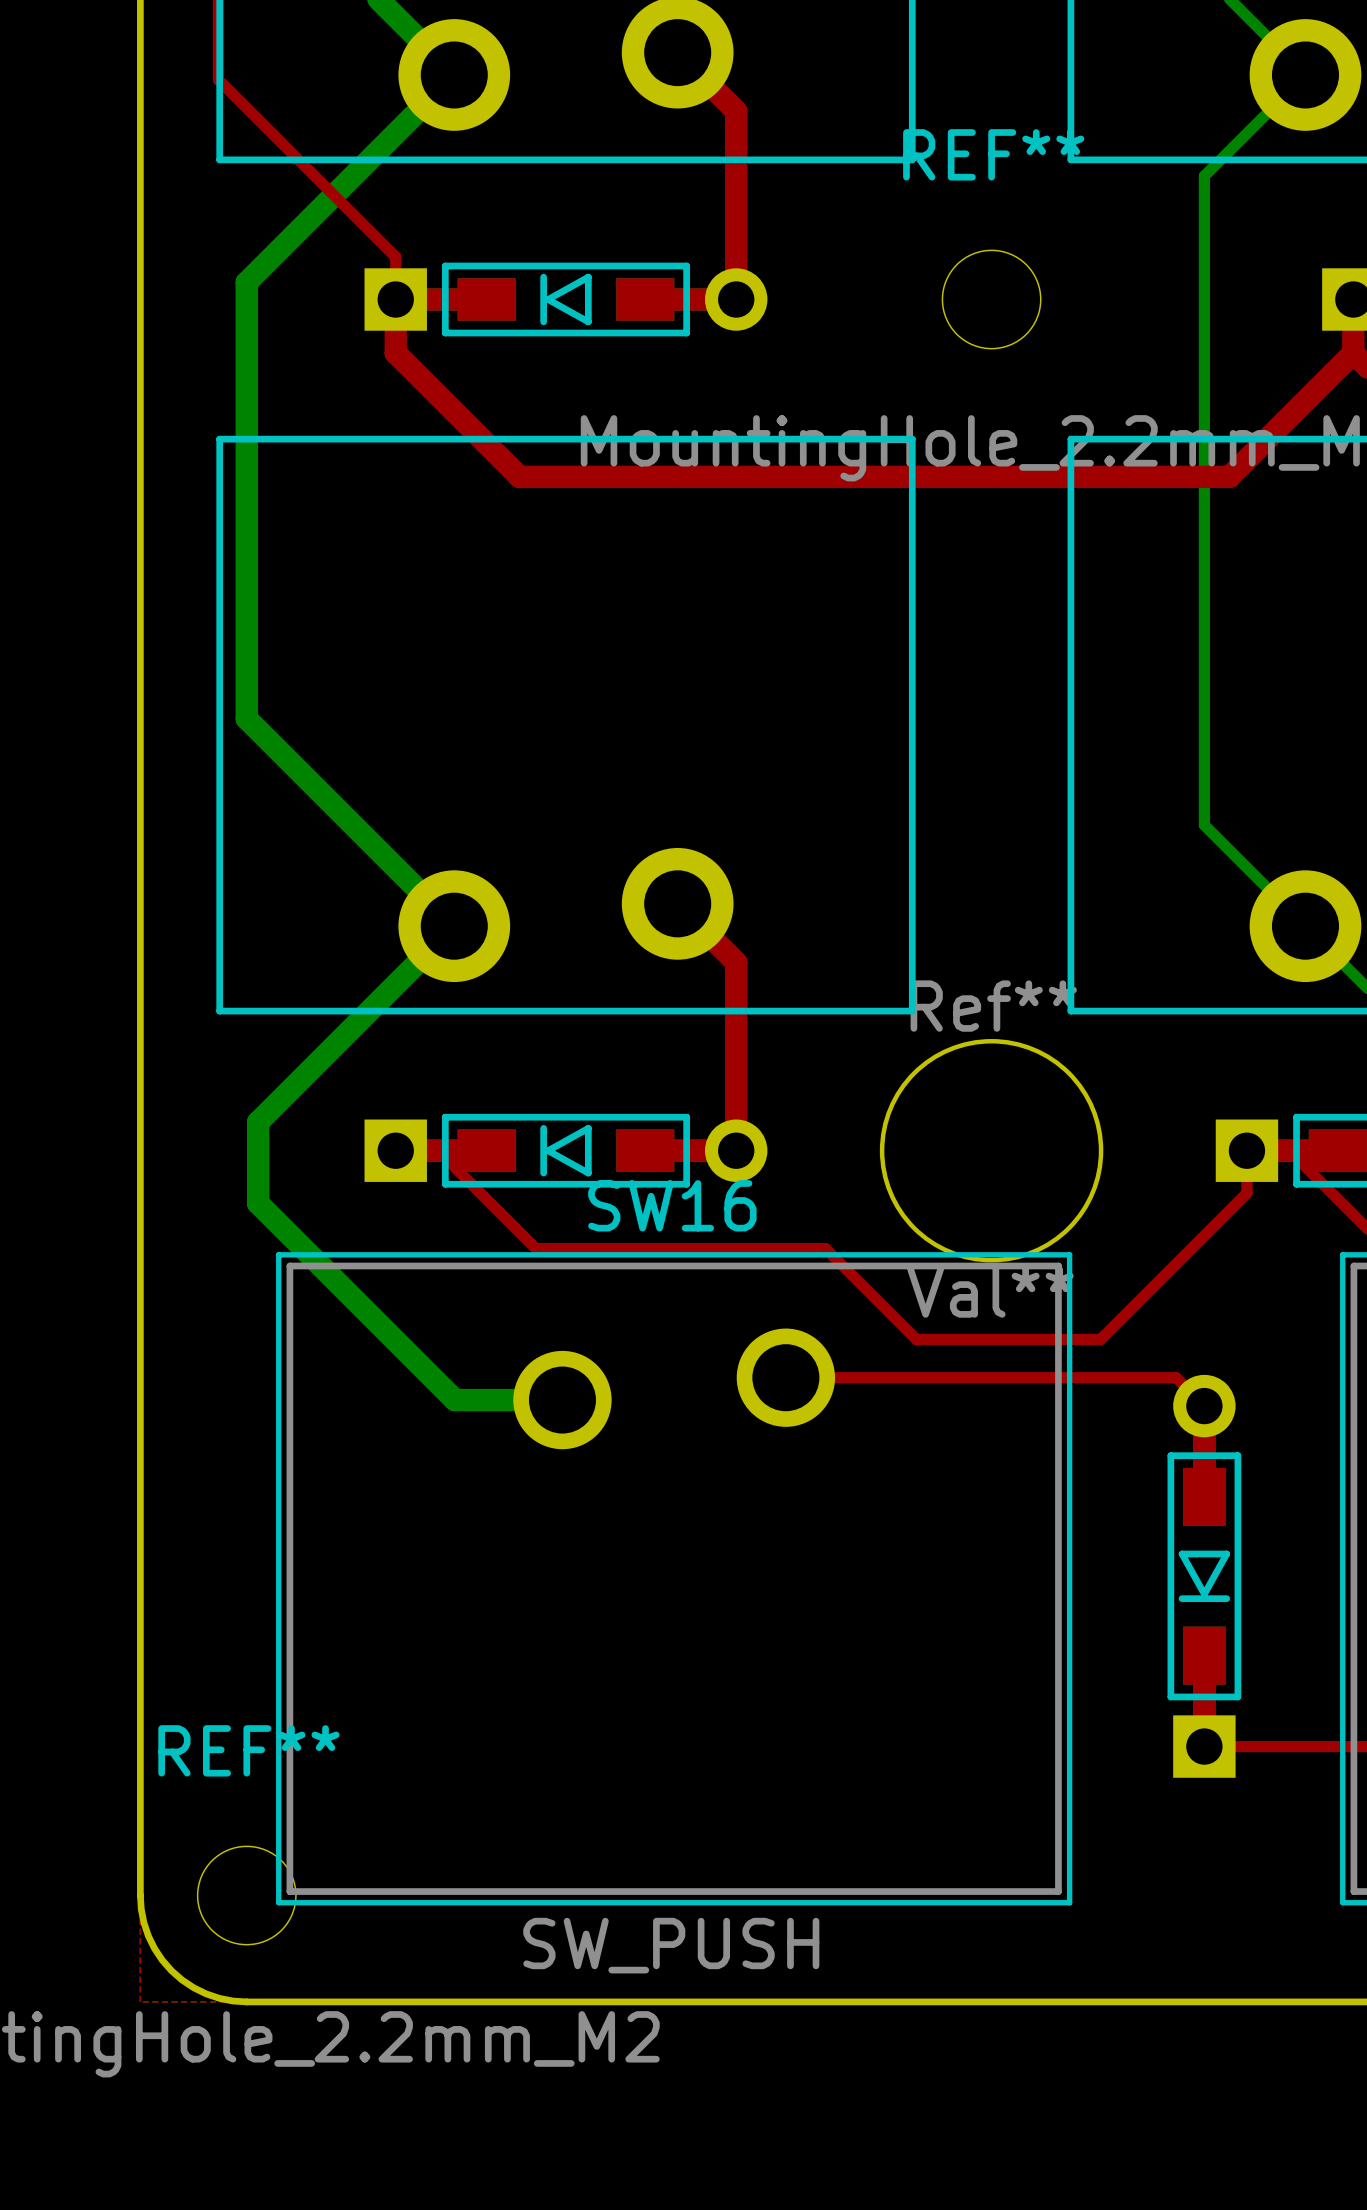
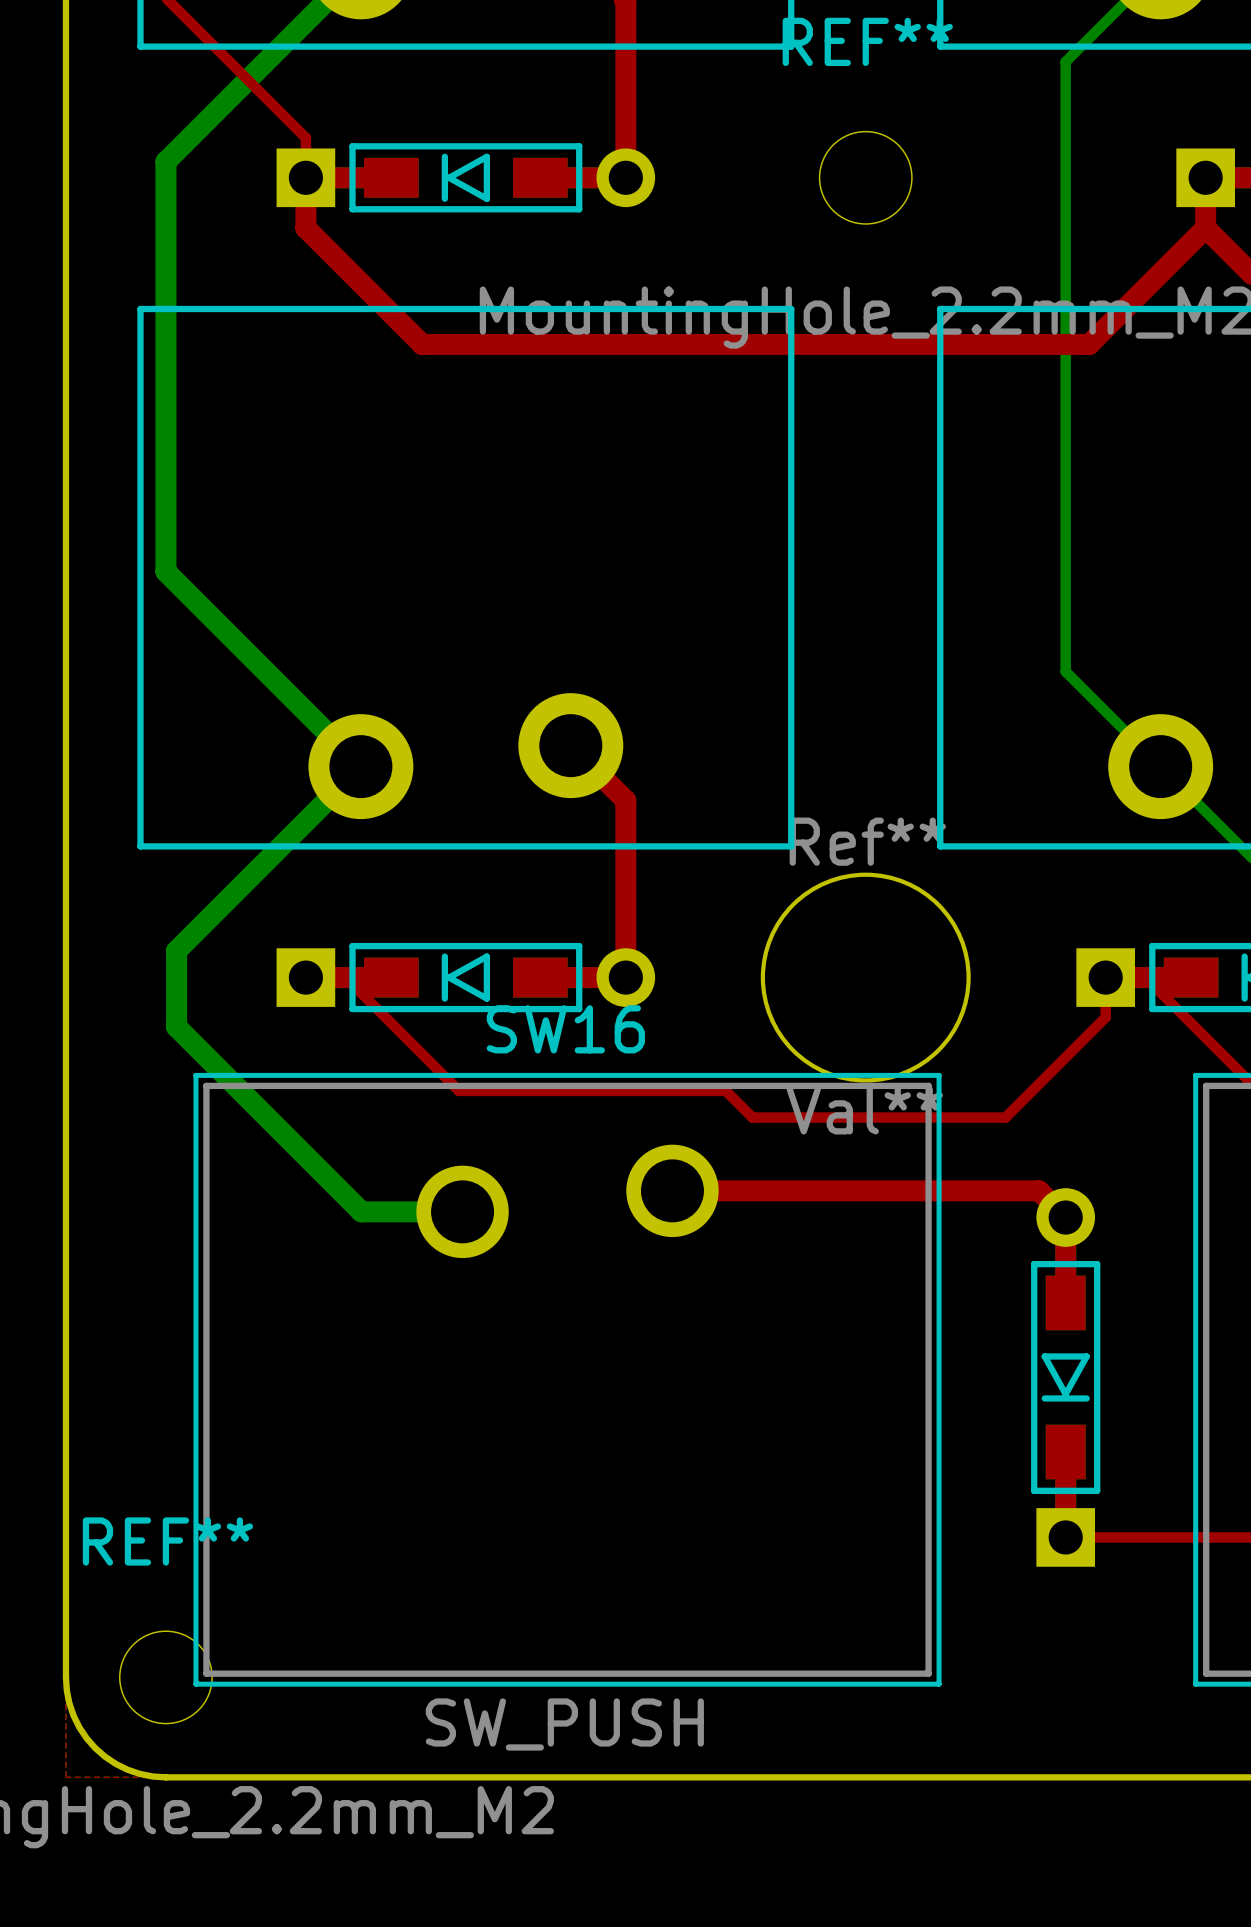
top track: (536, 1248) (825, 1248) (916, 1339) (1100, 1339) (1140, 1299) -> (437, 1069) (459, 1090) (725, 1090) (752, 1117) (1005, 1117)
top track width: thin (785, 1377) (1176, 1377) (1204, 1406) -> thick (672, 1190) (1039, 1190) (1065, 1217)

